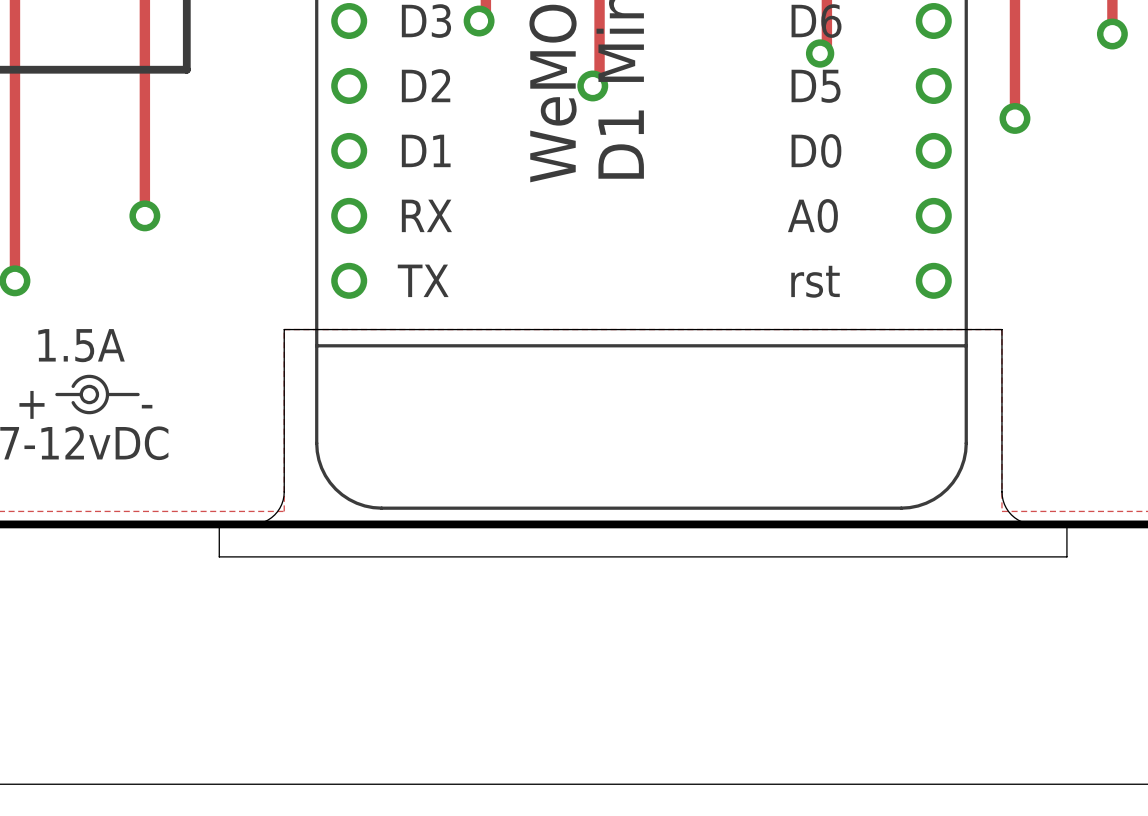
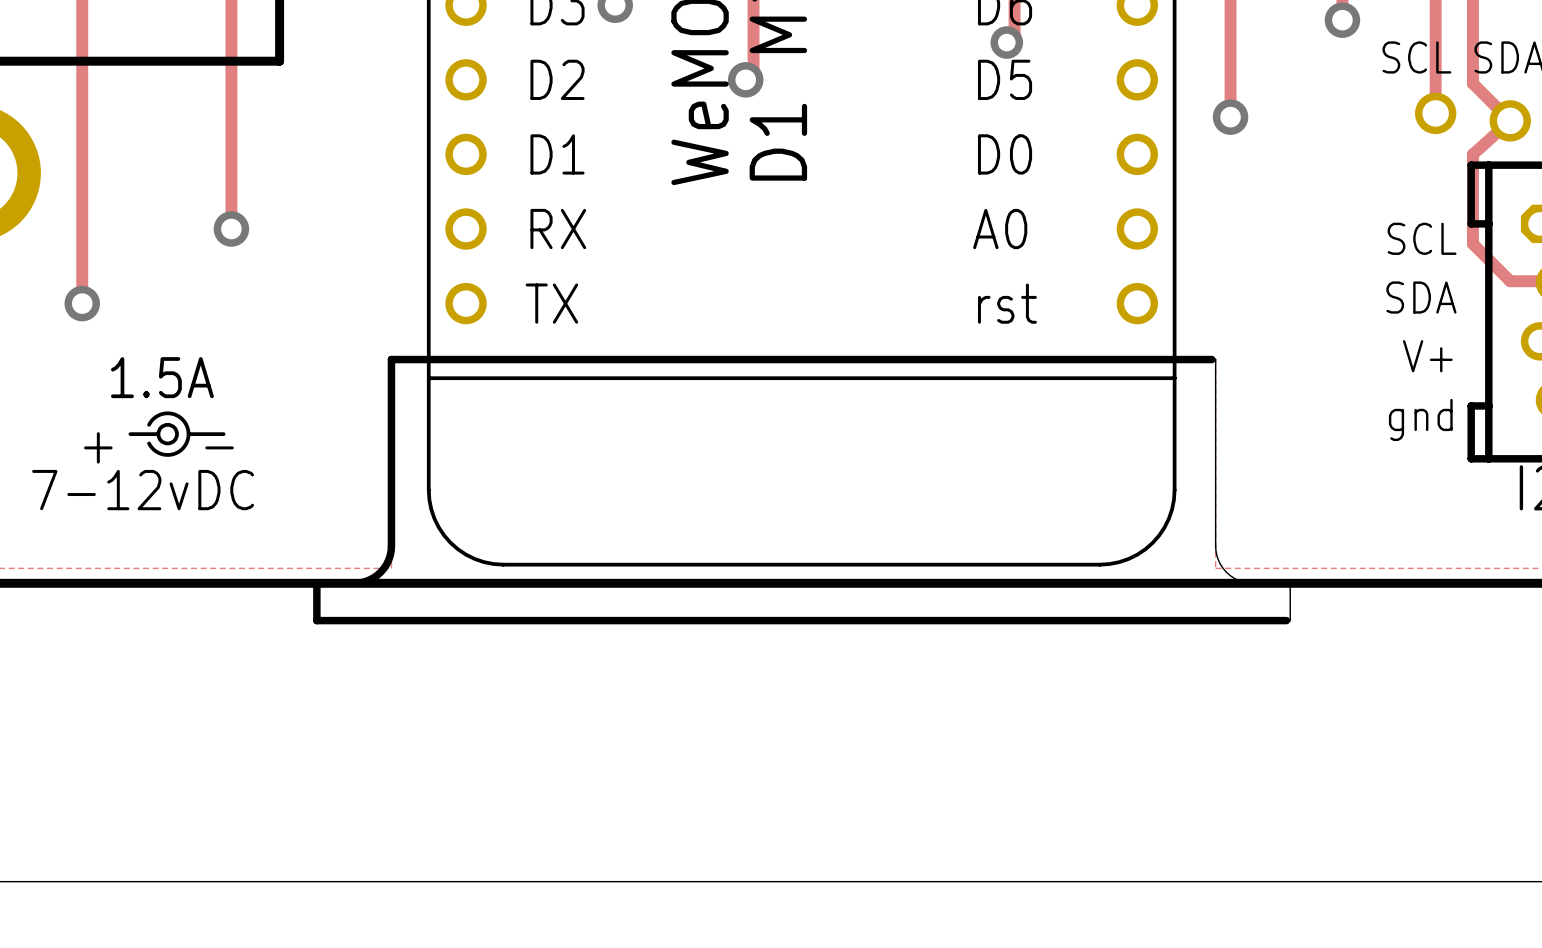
board edge width: thin (998, 329) (284, 329) (283, 500) (277, 511) (264, 521) (251, 524) (219, 524) (219, 556) (1063, 556) -> thick (1211, 359) (391, 359) (390, 555) (383, 568) (368, 580) (354, 583) (316, 583) (316, 620) (1286, 620)

